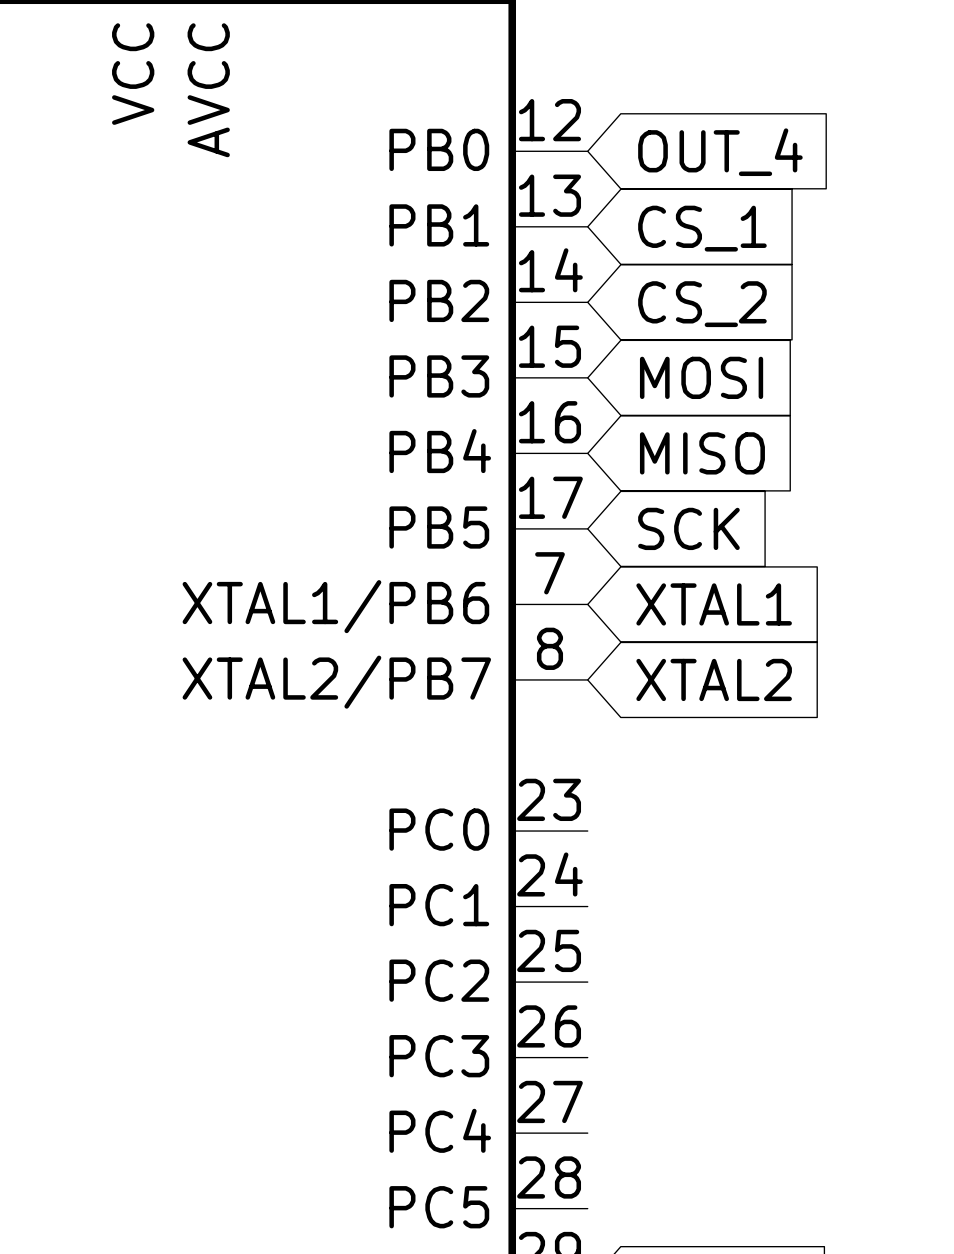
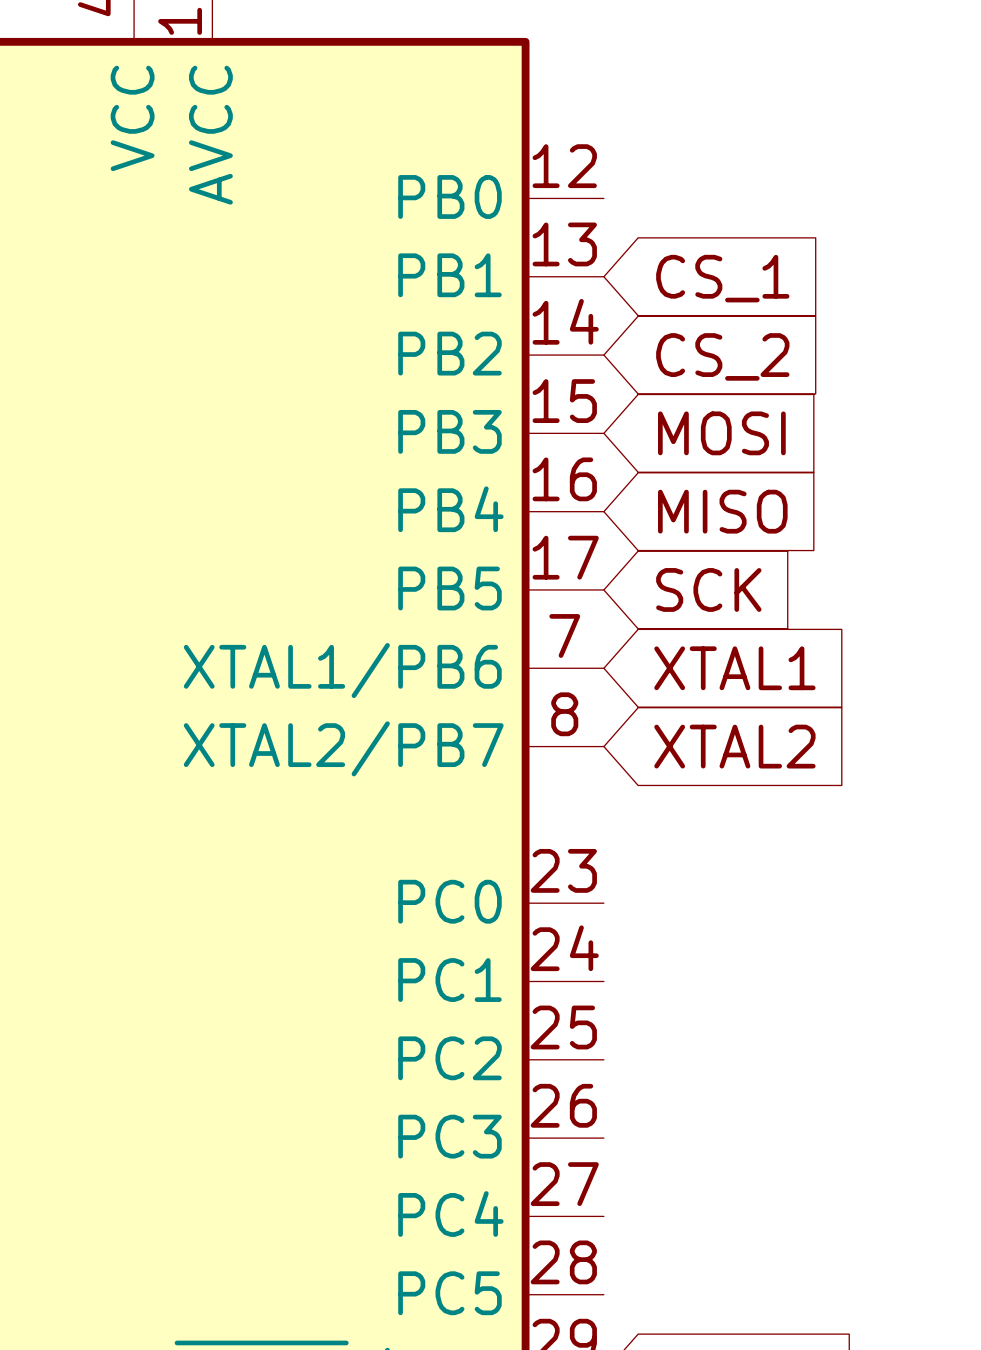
global label: OUT_4 (720, 152) -> none

